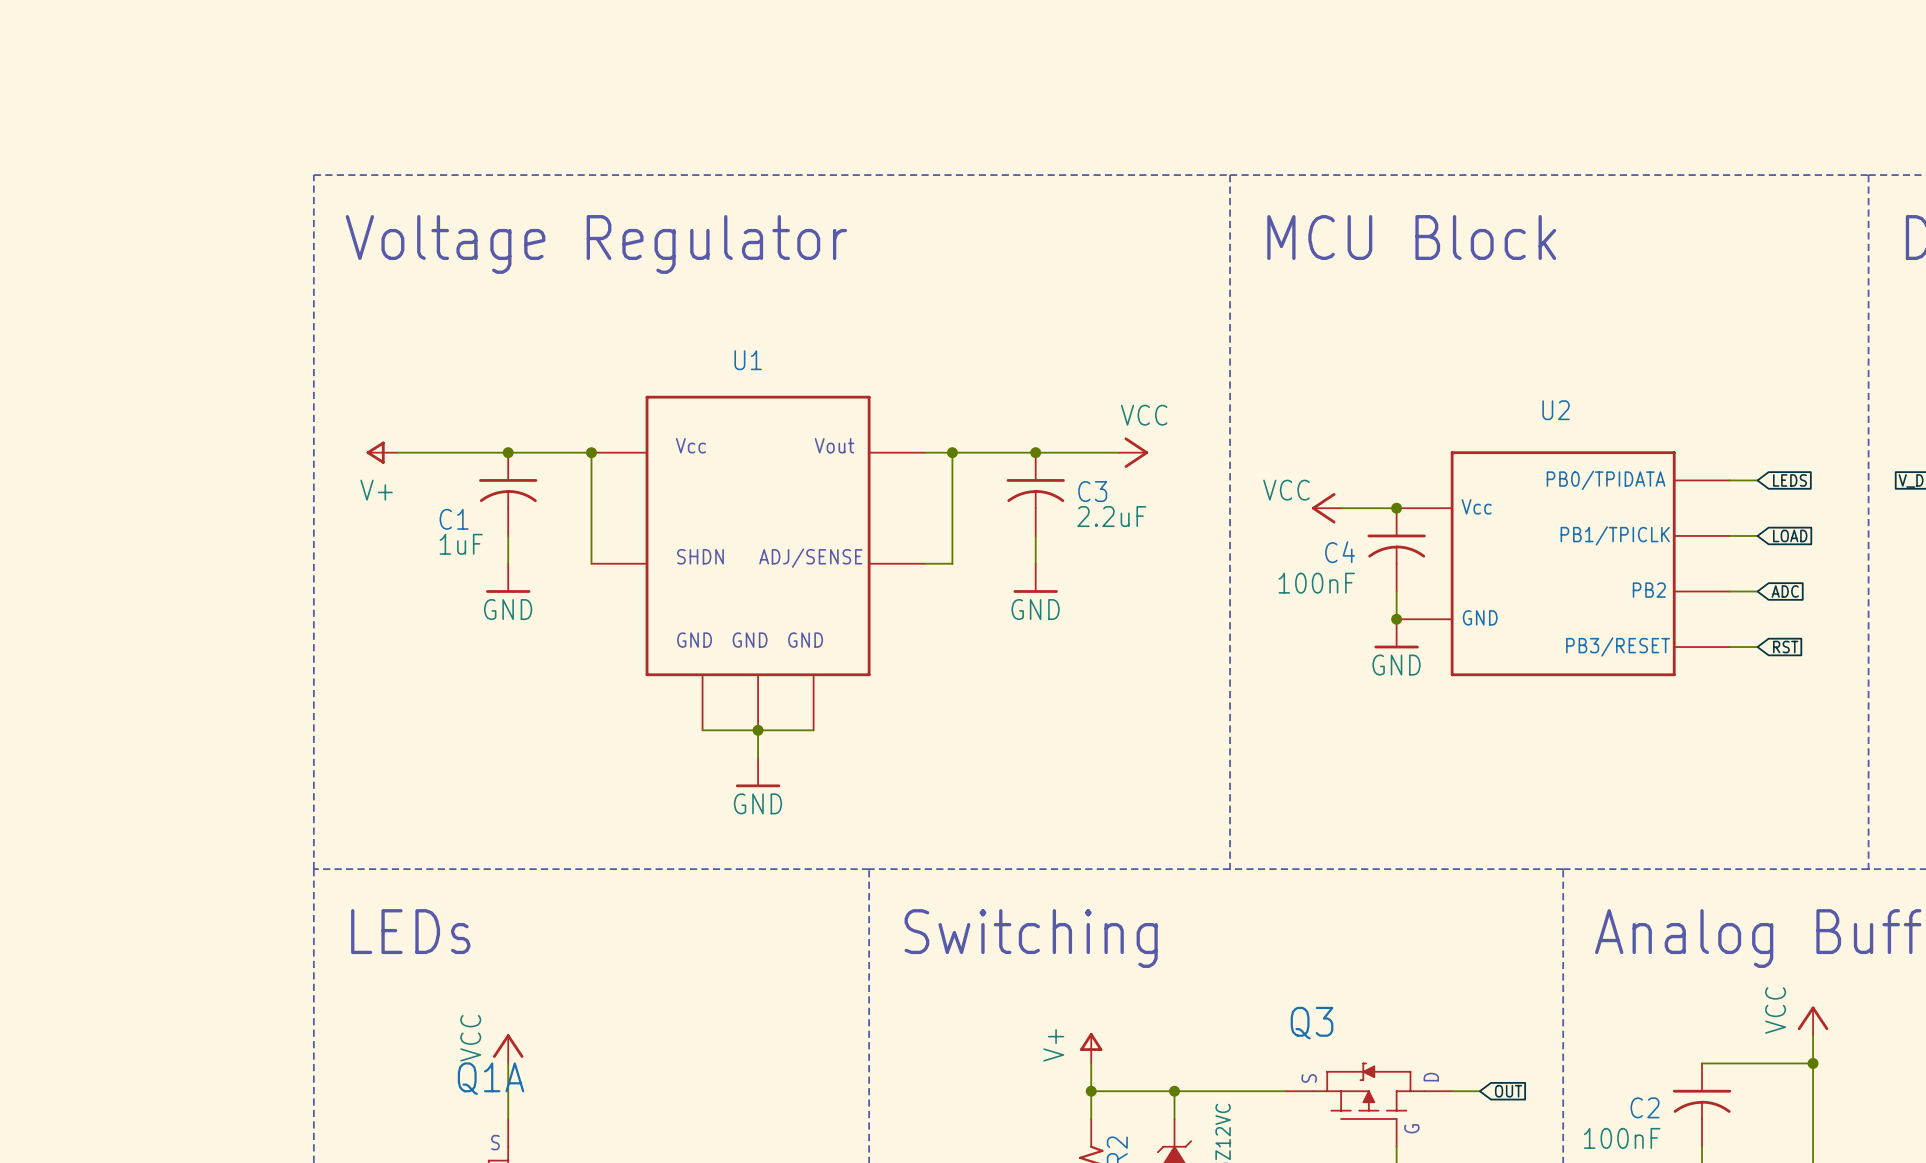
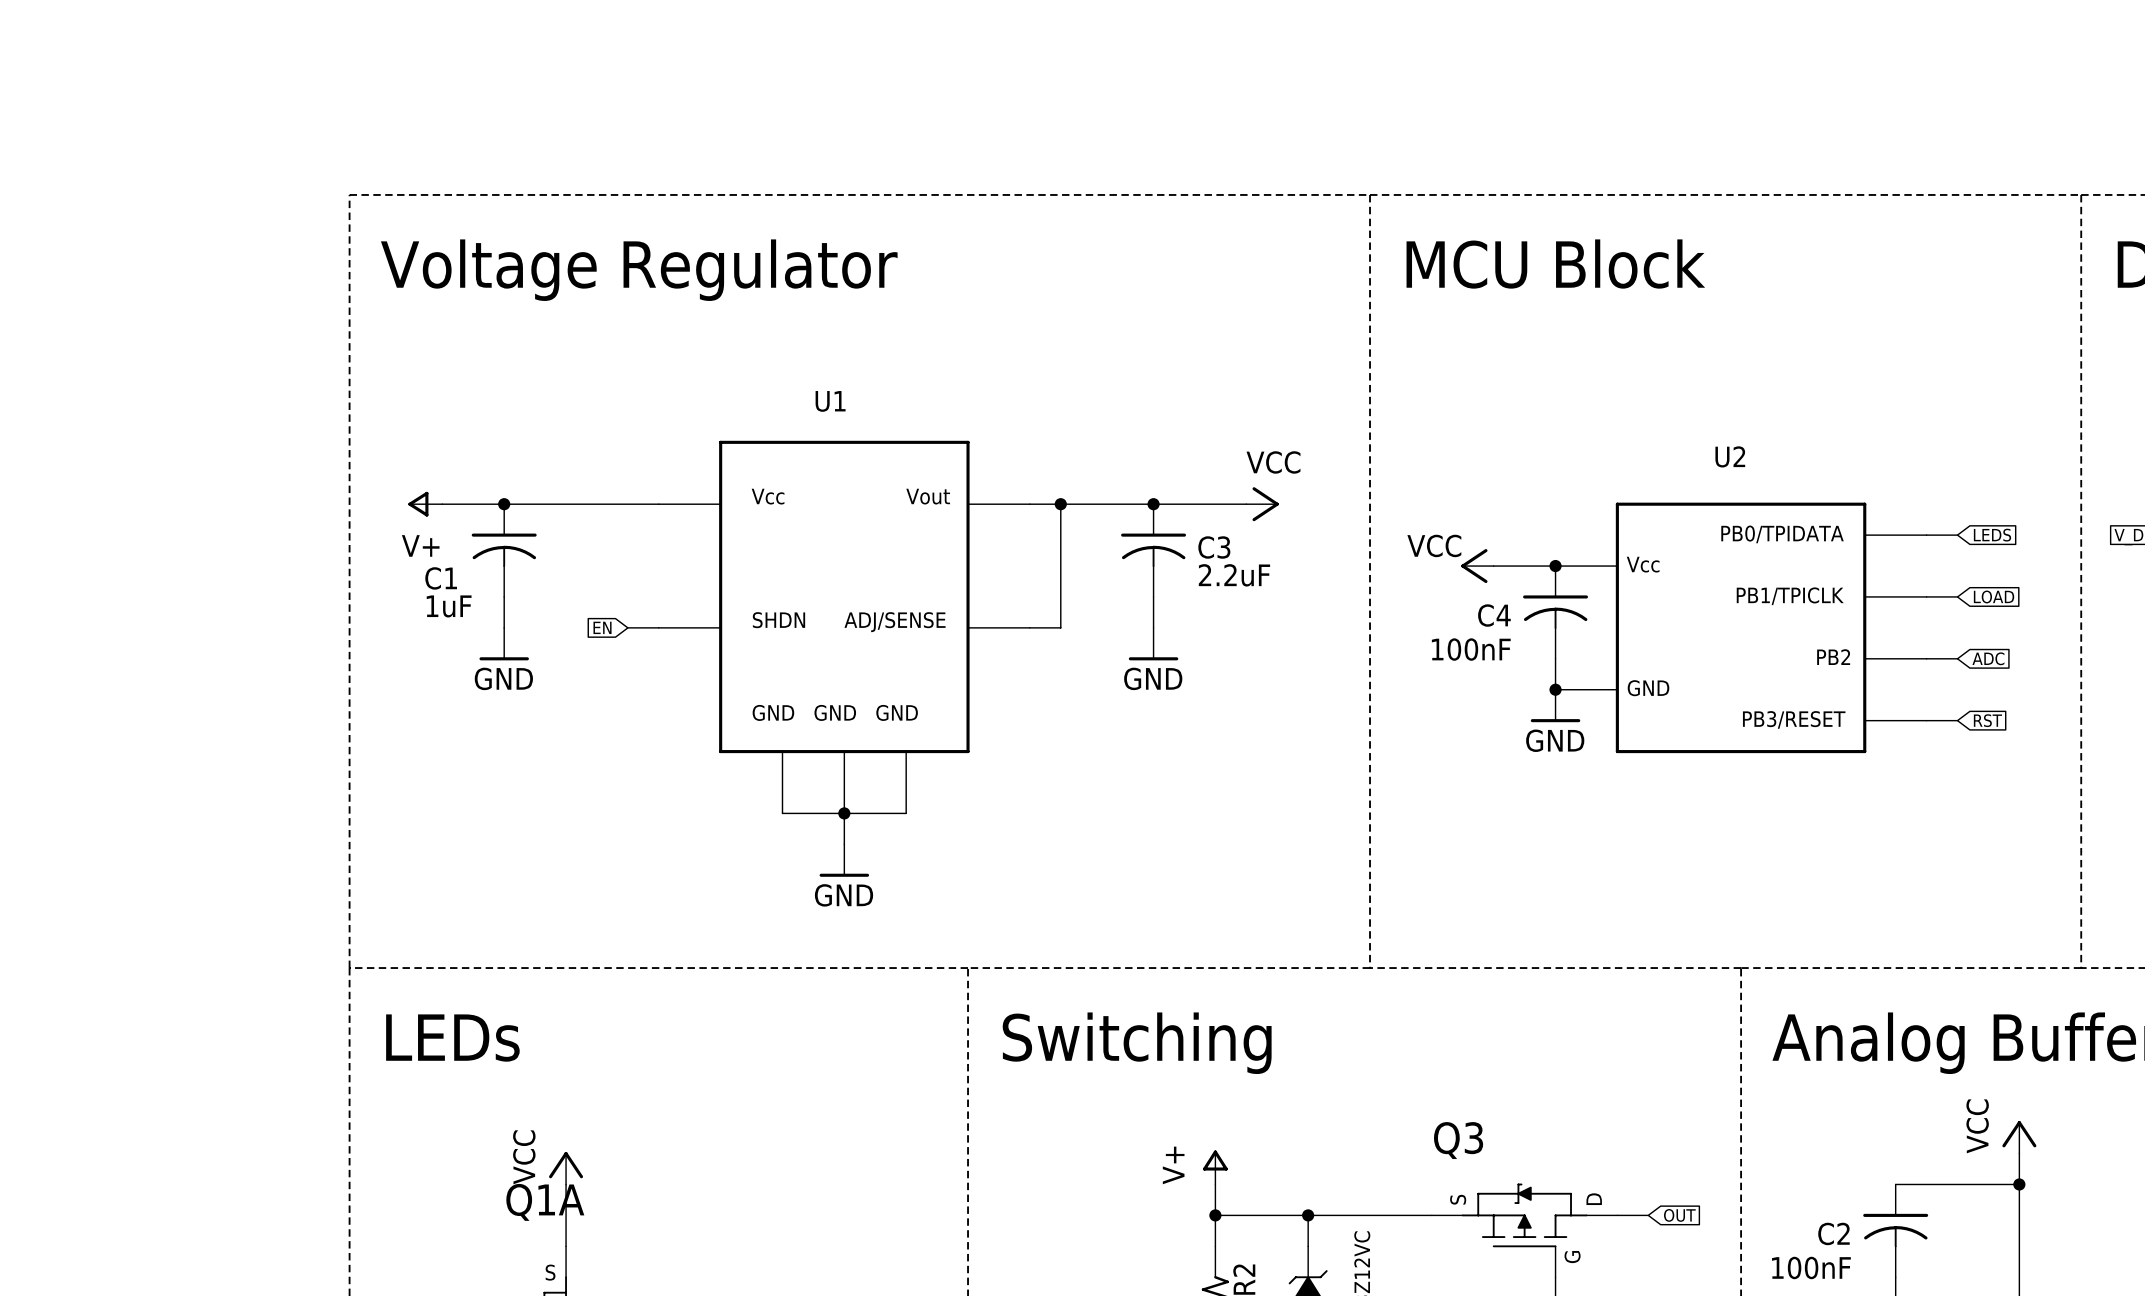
junction position: (508, 452) -> (504, 504)
wire: (591, 452) (591, 563) -> (627, 627) (658, 627)
junction: (591, 452) -> none
C1 position: (508, 494) -> (504, 550)
wire: (508, 535) (508, 563) -> (504, 596) (504, 627)
global label: none -> EN (602, 627)
power symbol position: GND (508, 578) -> GND (504, 644)

